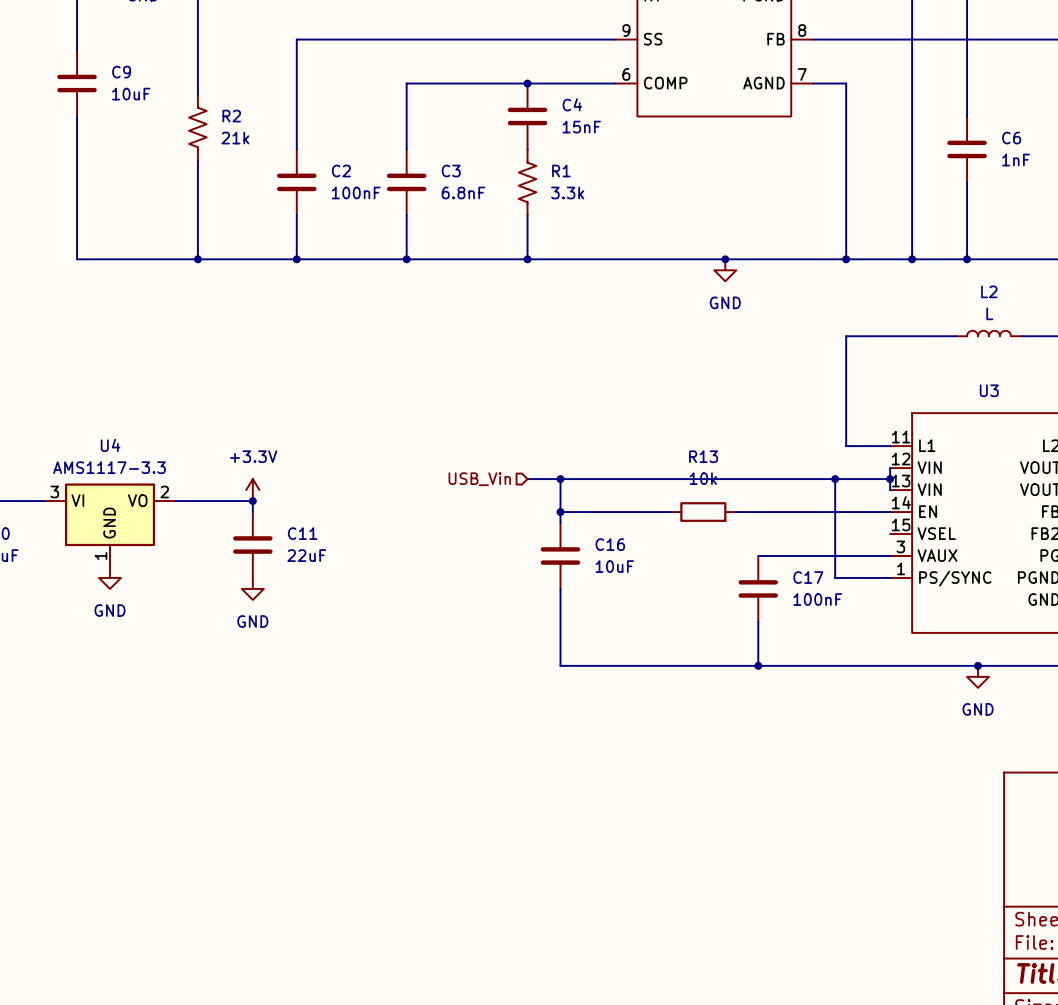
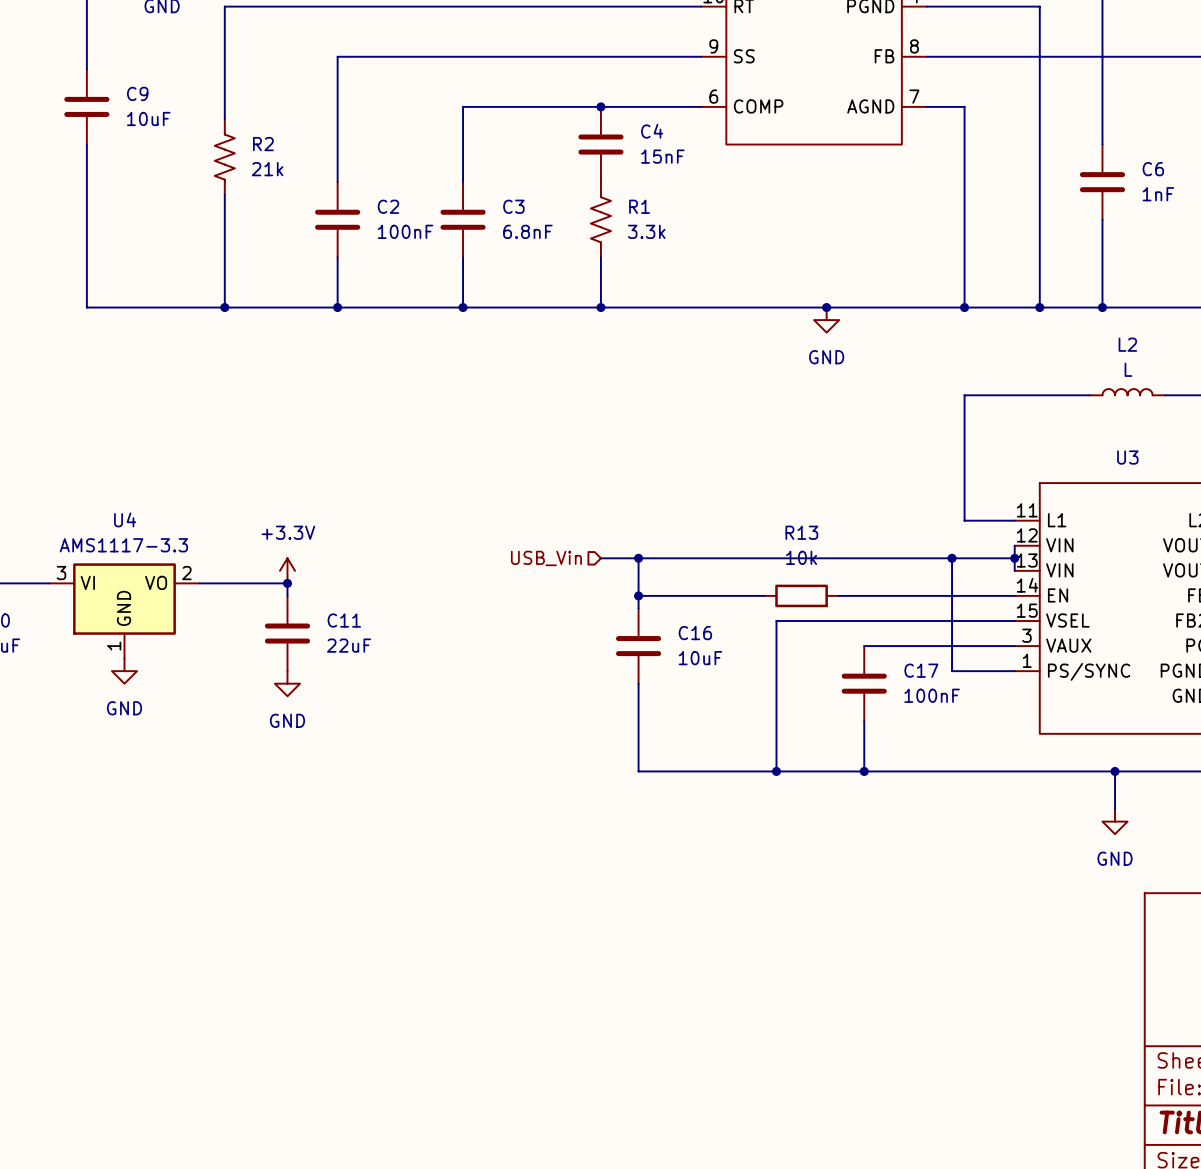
wire: none -> (1014, 620) (776, 620) (776, 771)
junction: none -> (776, 771)
wire: none -> (1115, 771) (1115, 809)
power symbol position: GND (978, 676) -> GND (1115, 821)

